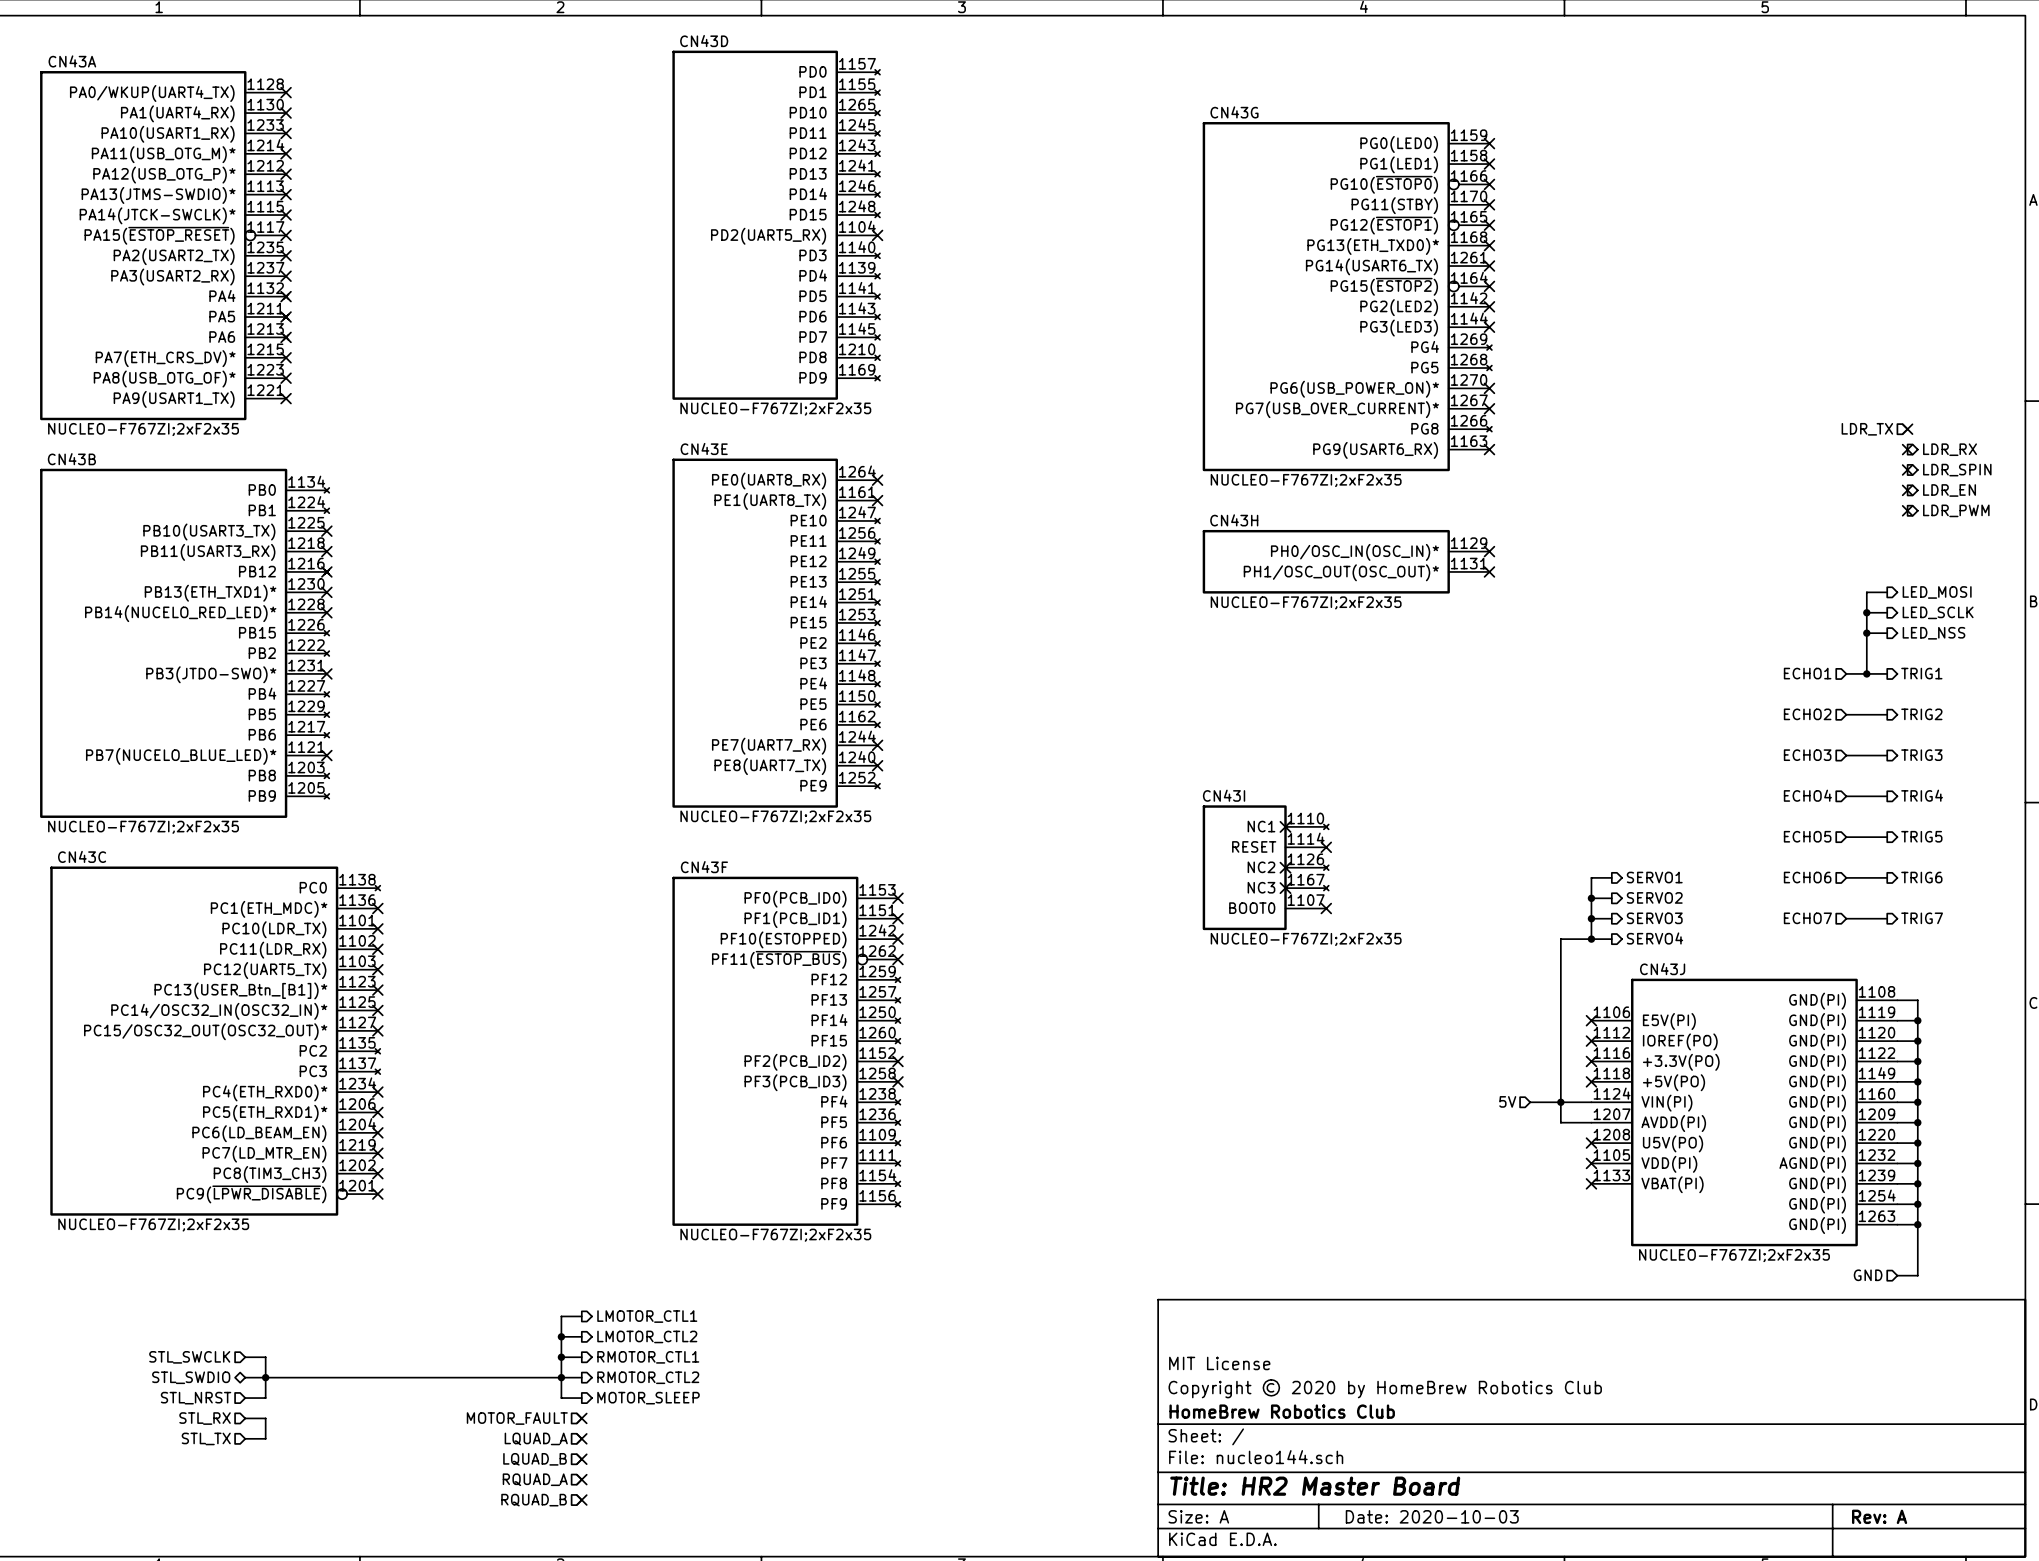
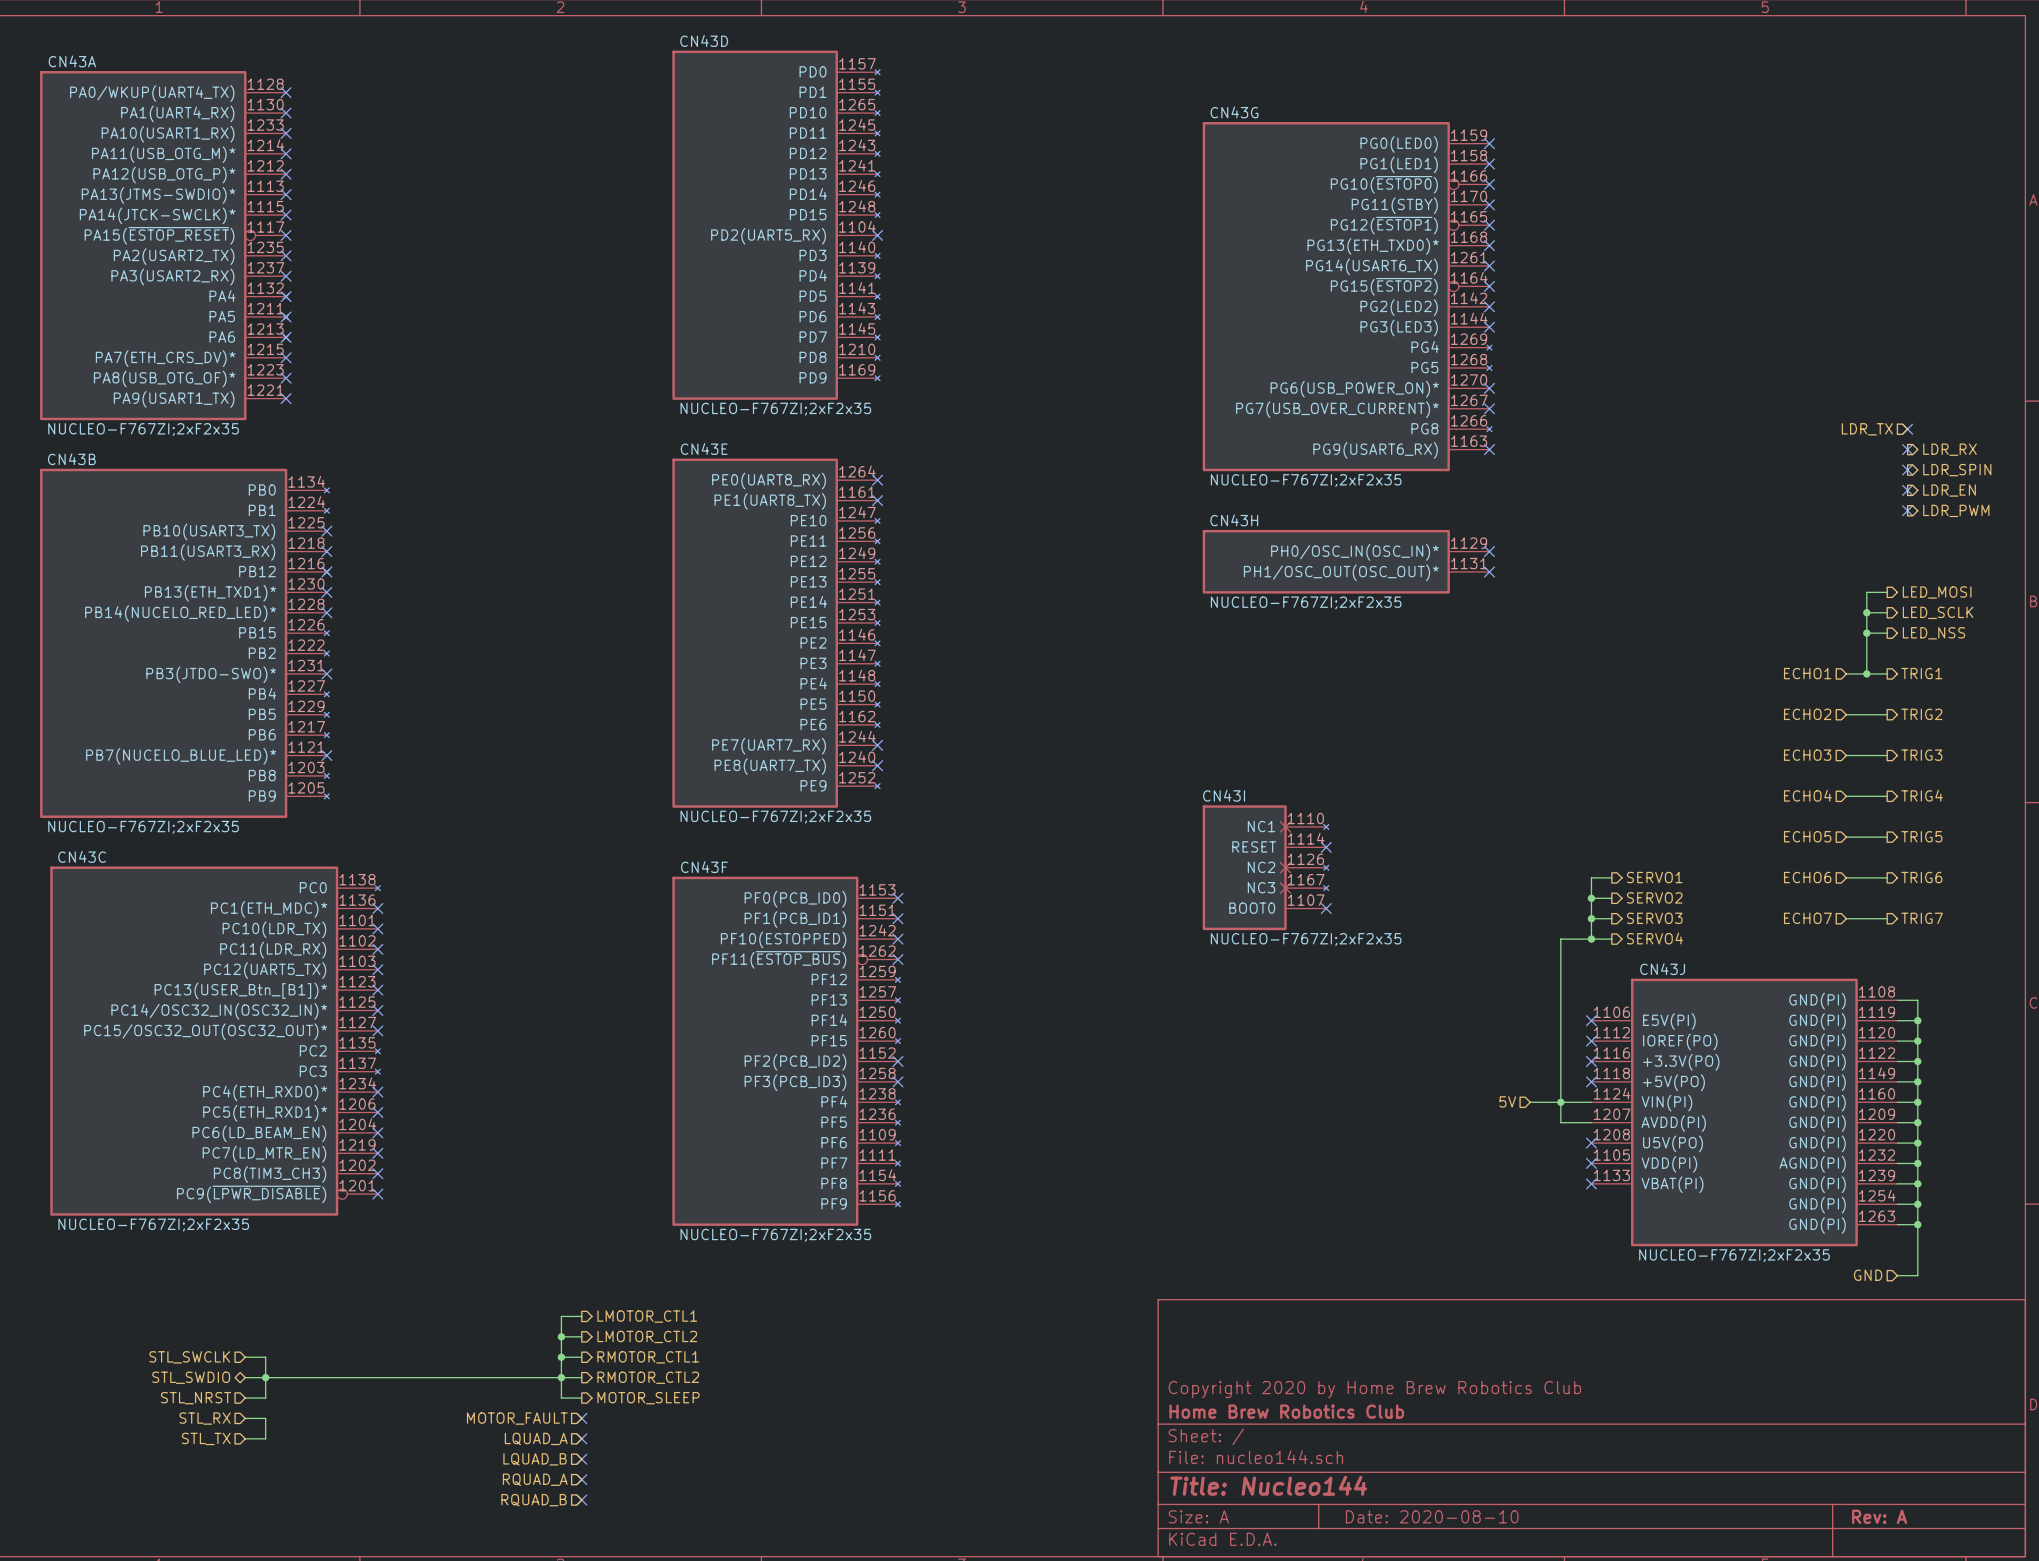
title block: MIT License (1219, 1363) -> none
title block: Copyright © 2020 by HomeBrew Robotics Club (1385, 1388) -> Copyright 2020 by Home Brew Robotics Club (1374, 1389)
title block: HomeBrew Robotics Club (1282, 1411) -> Home Brew Robotics Club (1286, 1411)
title block: Title: HR2 Master Board (1315, 1486) -> Title: Nucleo144 (1268, 1485)
title block: Date: 2020-10-03 (1432, 1516) -> Date: 2020-08-10 (1432, 1516)

